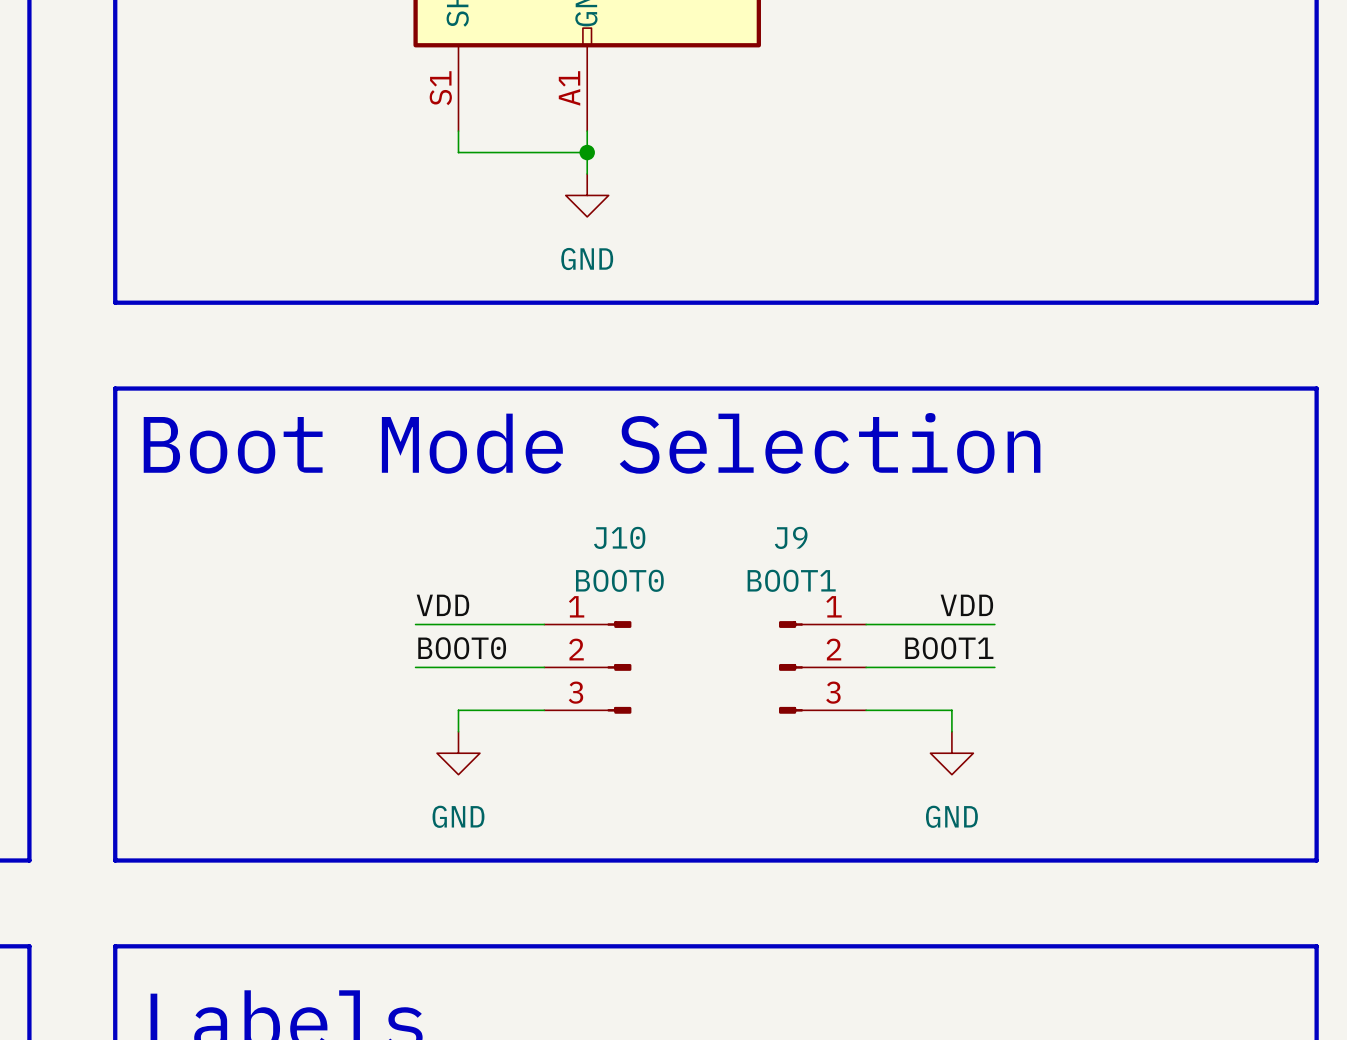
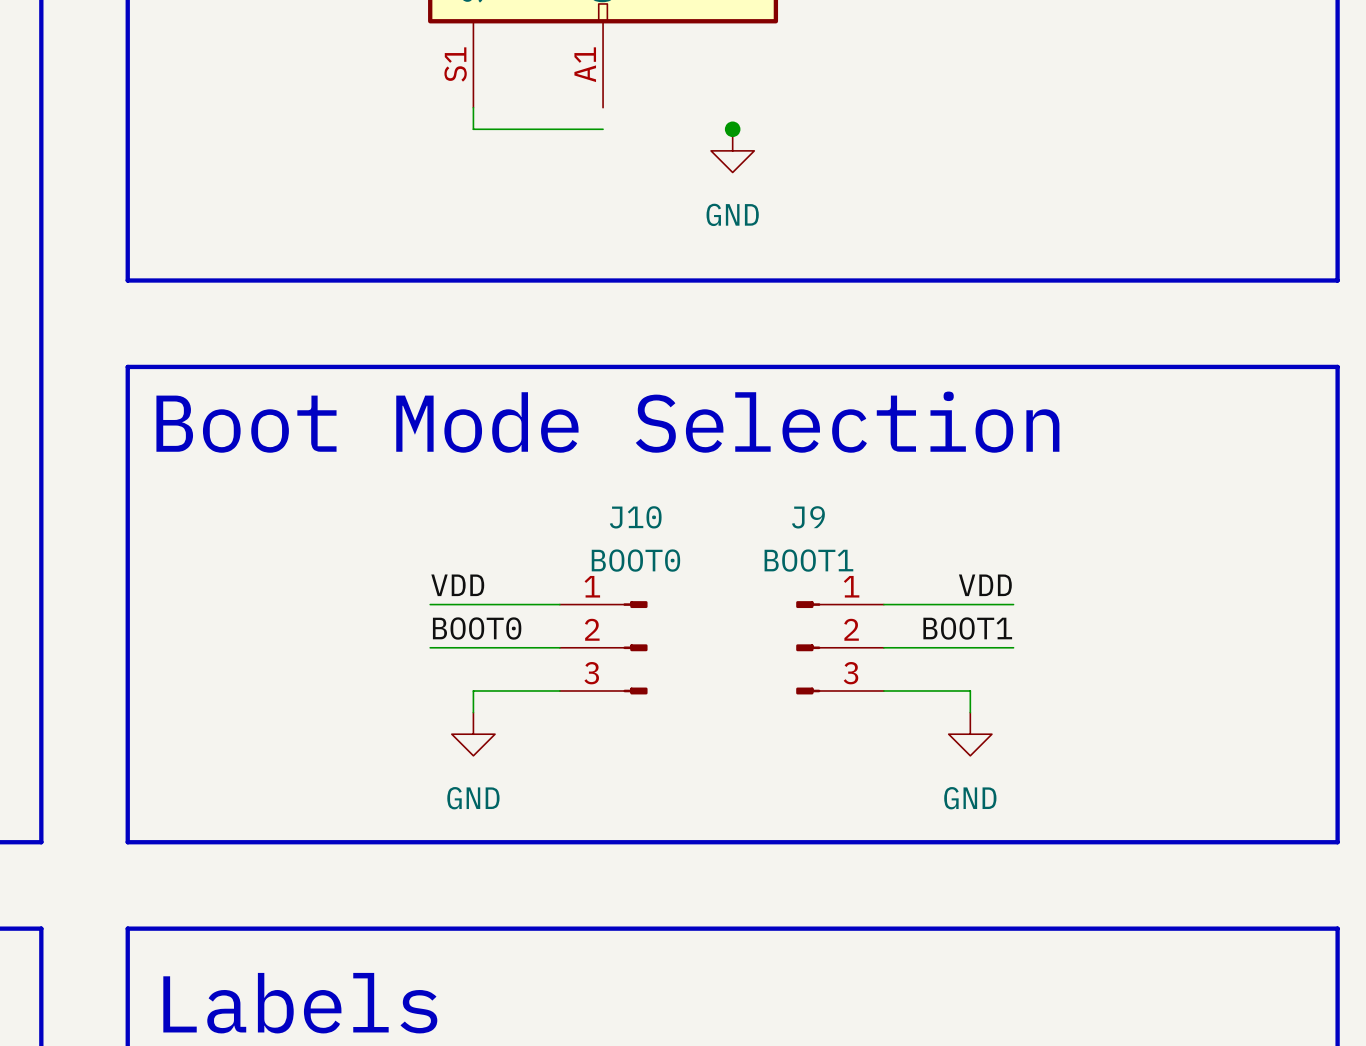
wire: (587, 131) (587, 173) -> none
junction: (587, 152) -> none
junction: none -> (732, 129)
power symbol position: GND (587, 195) -> GND (732, 150)

